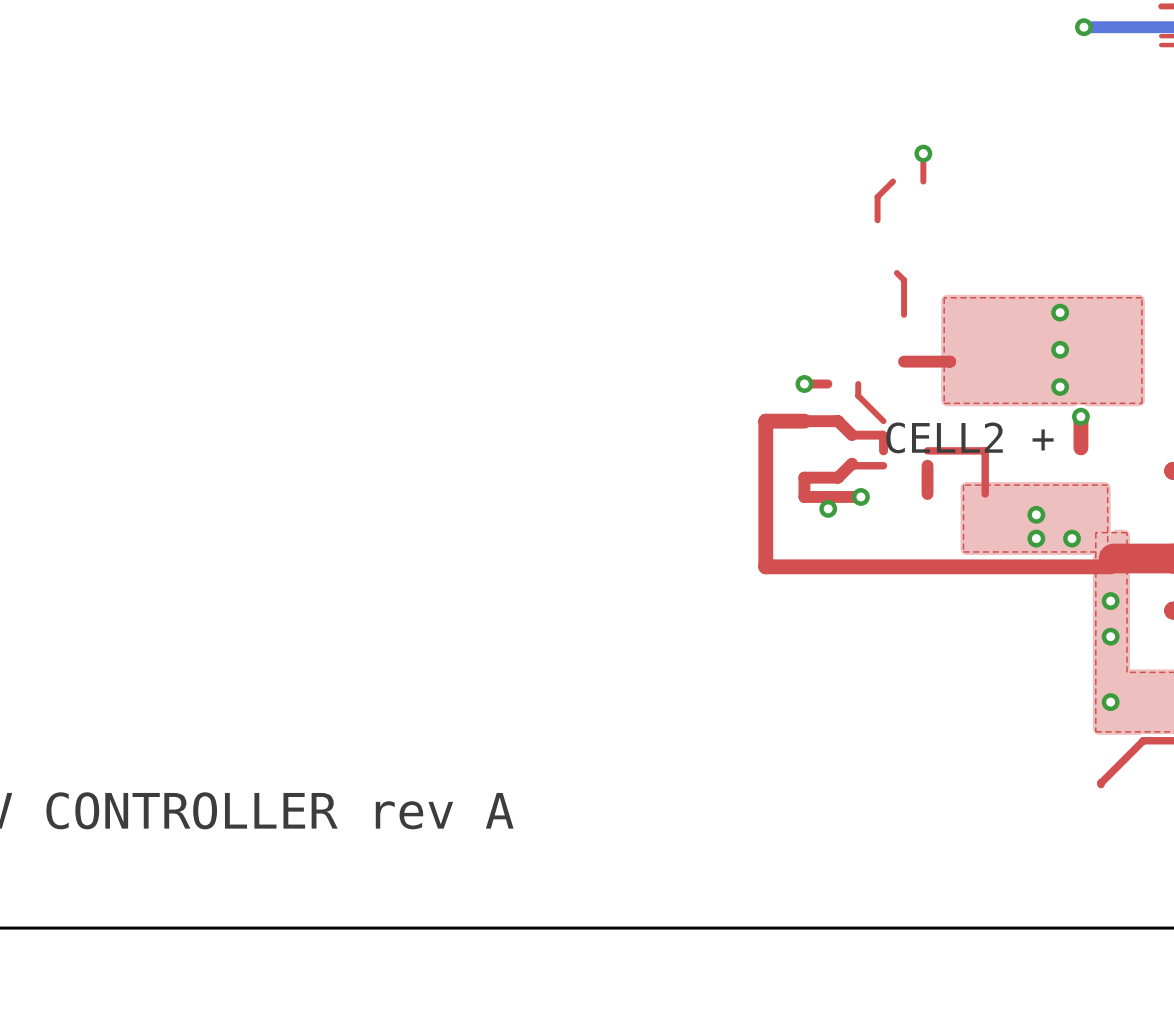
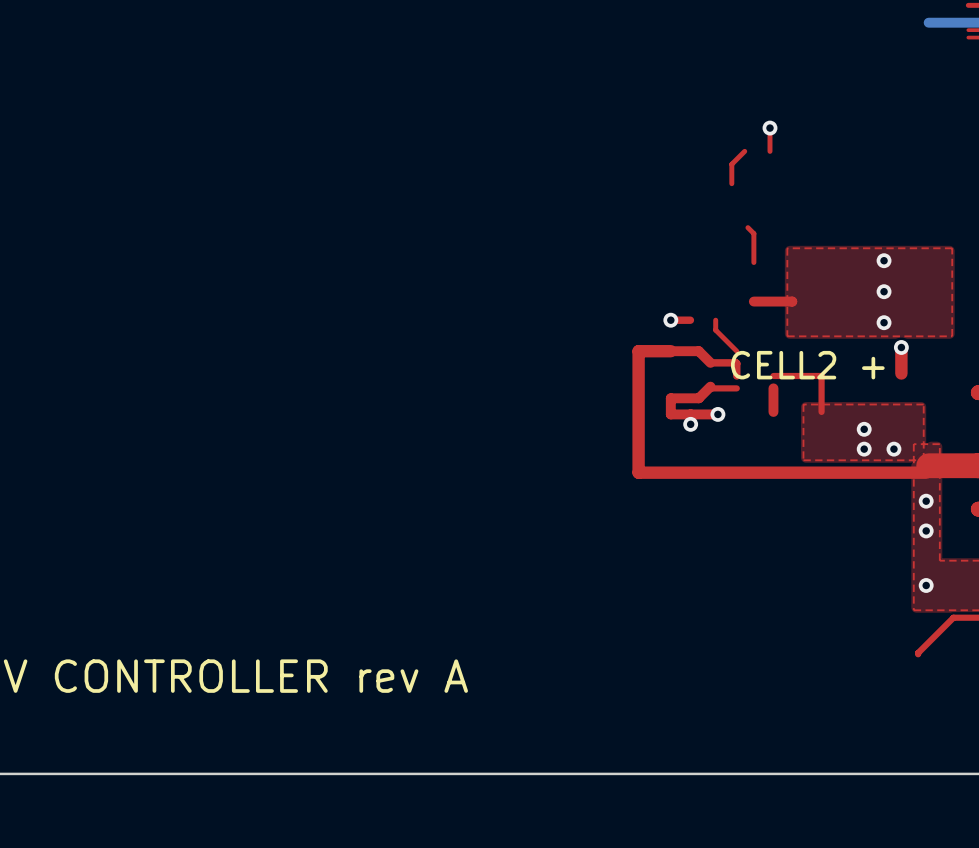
via: (1083, 27) -> none
bottom track: (1113, 27) (1083, 27) -> none

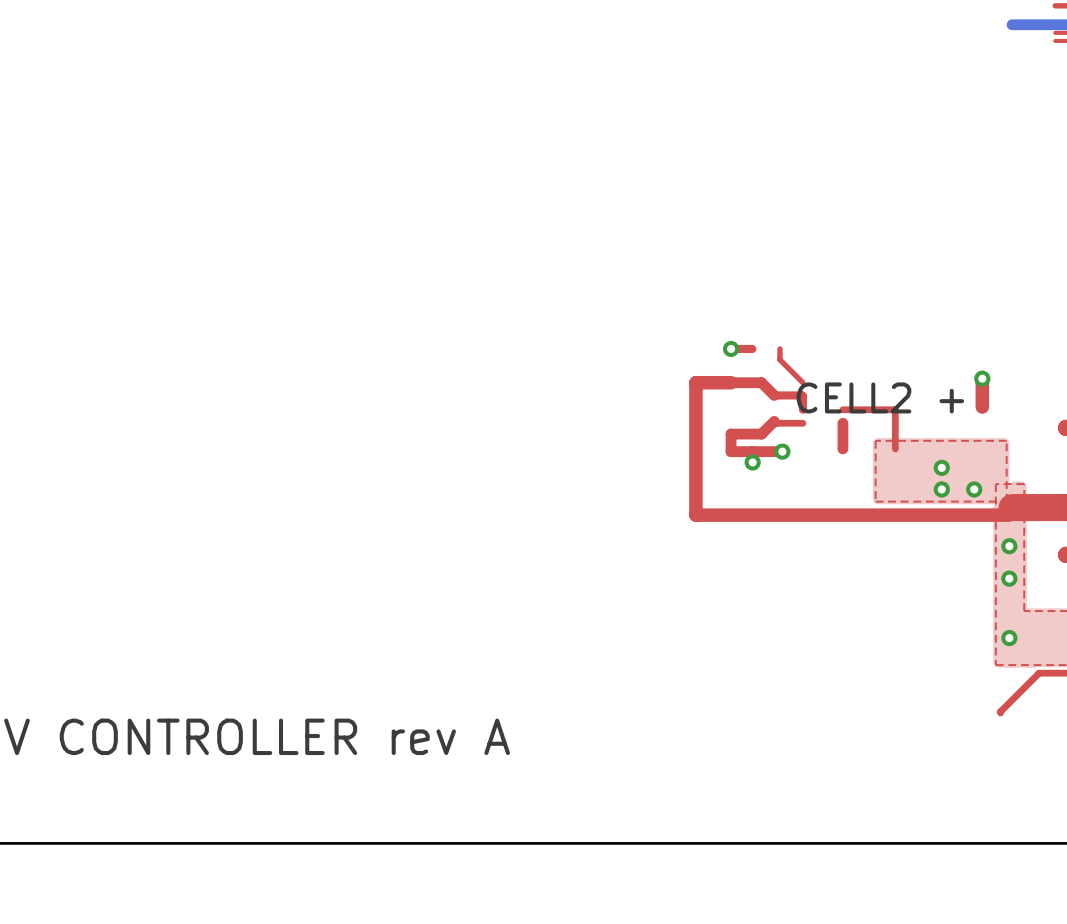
top track: (769, 128) (769, 151) -> none
via: (769, 128) -> none
top track: (744, 151) (731, 164) (731, 183) -> none
top track: (747, 227) (753, 233) (753, 262) -> none
top zone outline: (952, 248) (787, 248) (787, 336) (952, 336) (952, 248) -> none
via: (884, 260) -> none
via: (884, 291) -> none
top track: (792, 301) (753, 301) -> none
via: (884, 322) -> none

